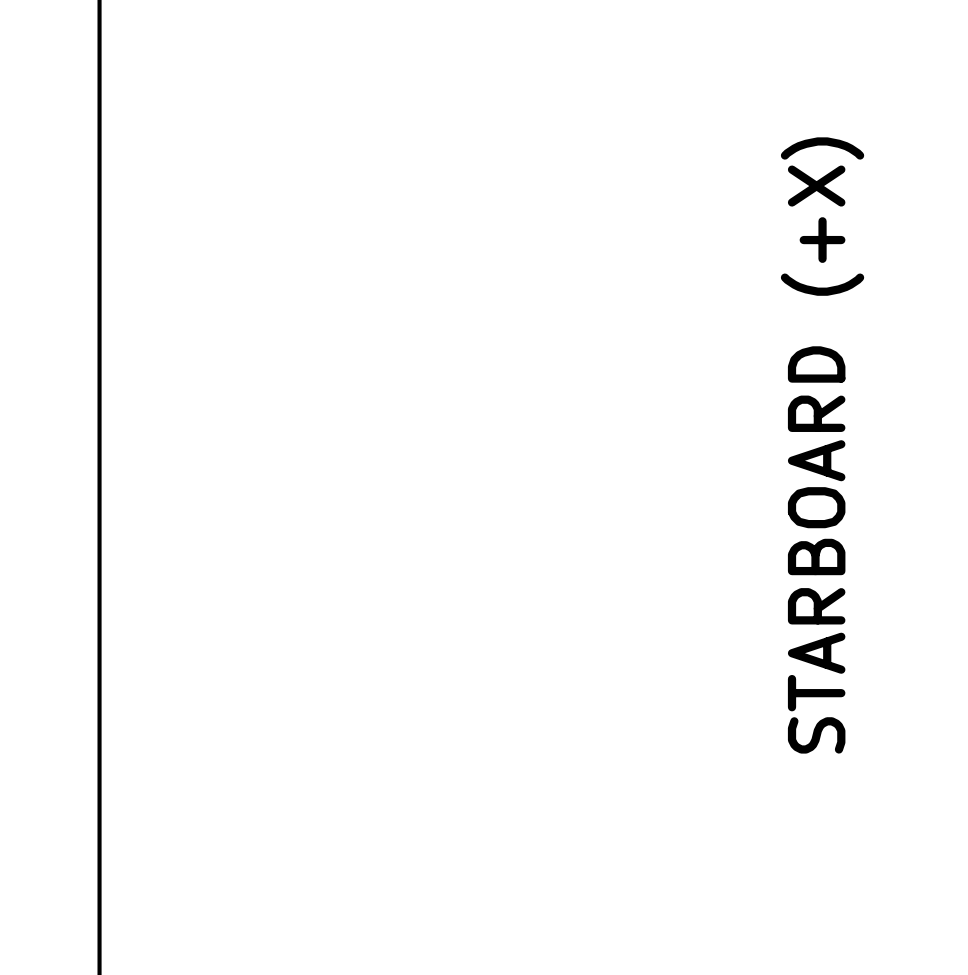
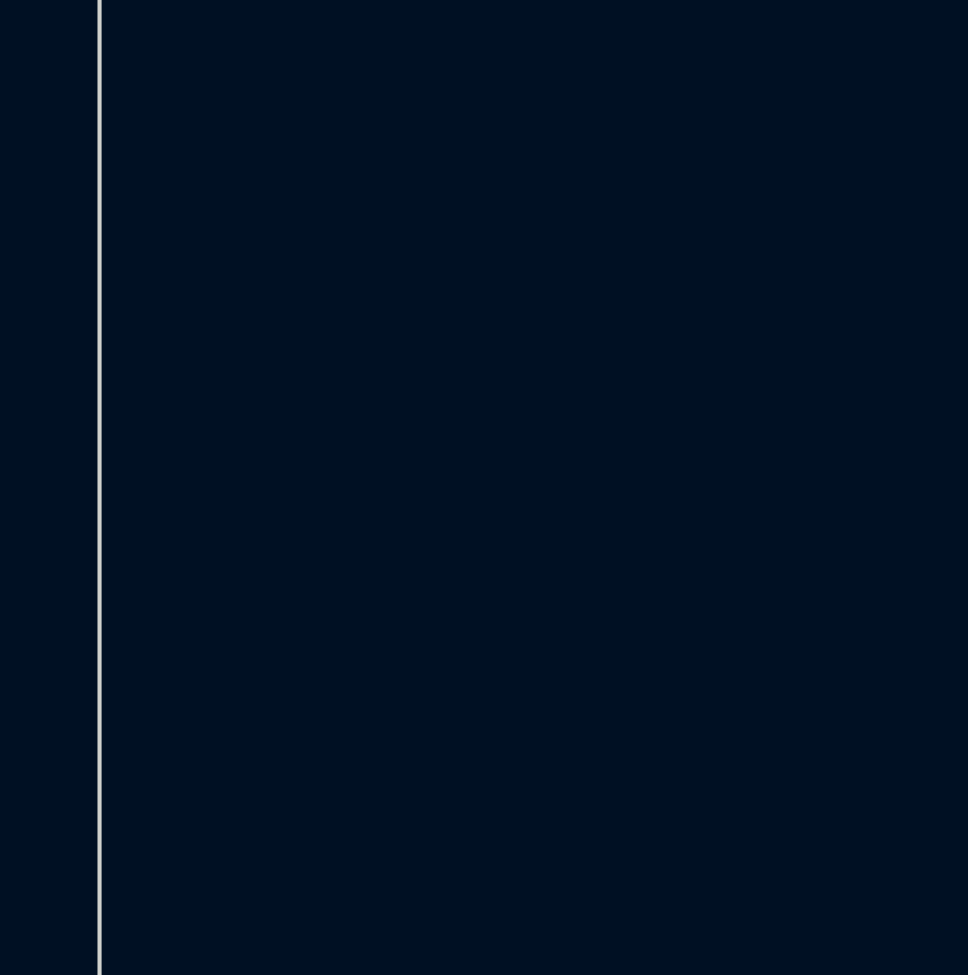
text: STARBOARD (+X) (822, 445) -> none

